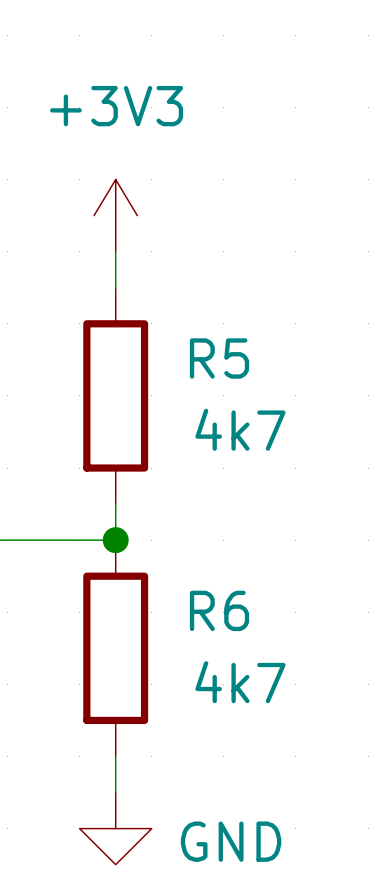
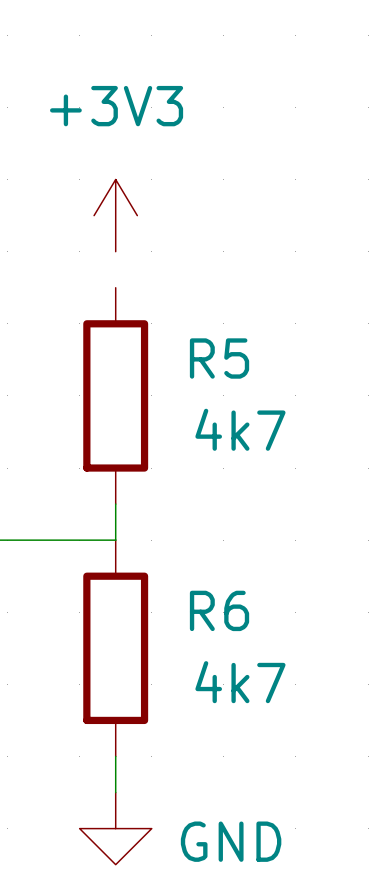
wire: (115, 251) (115, 287) -> none
junction: (115, 540) -> none

